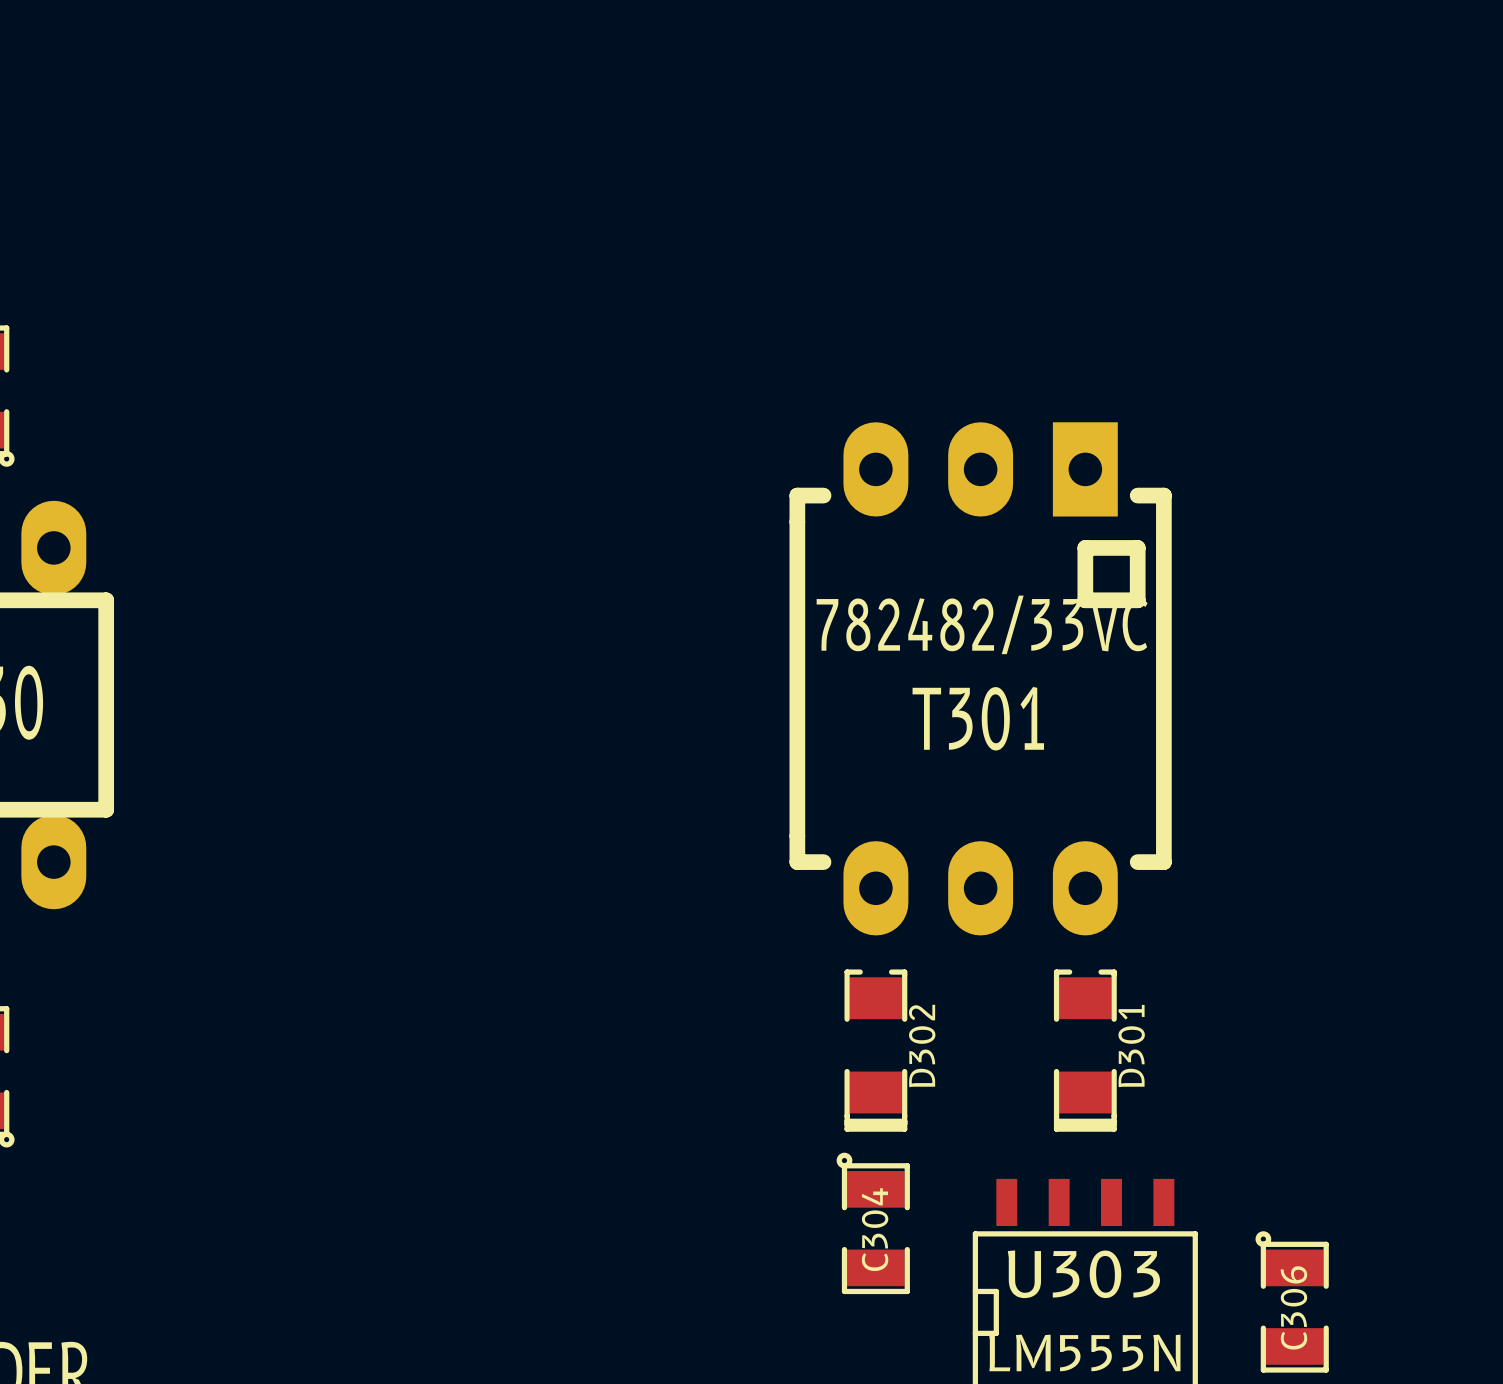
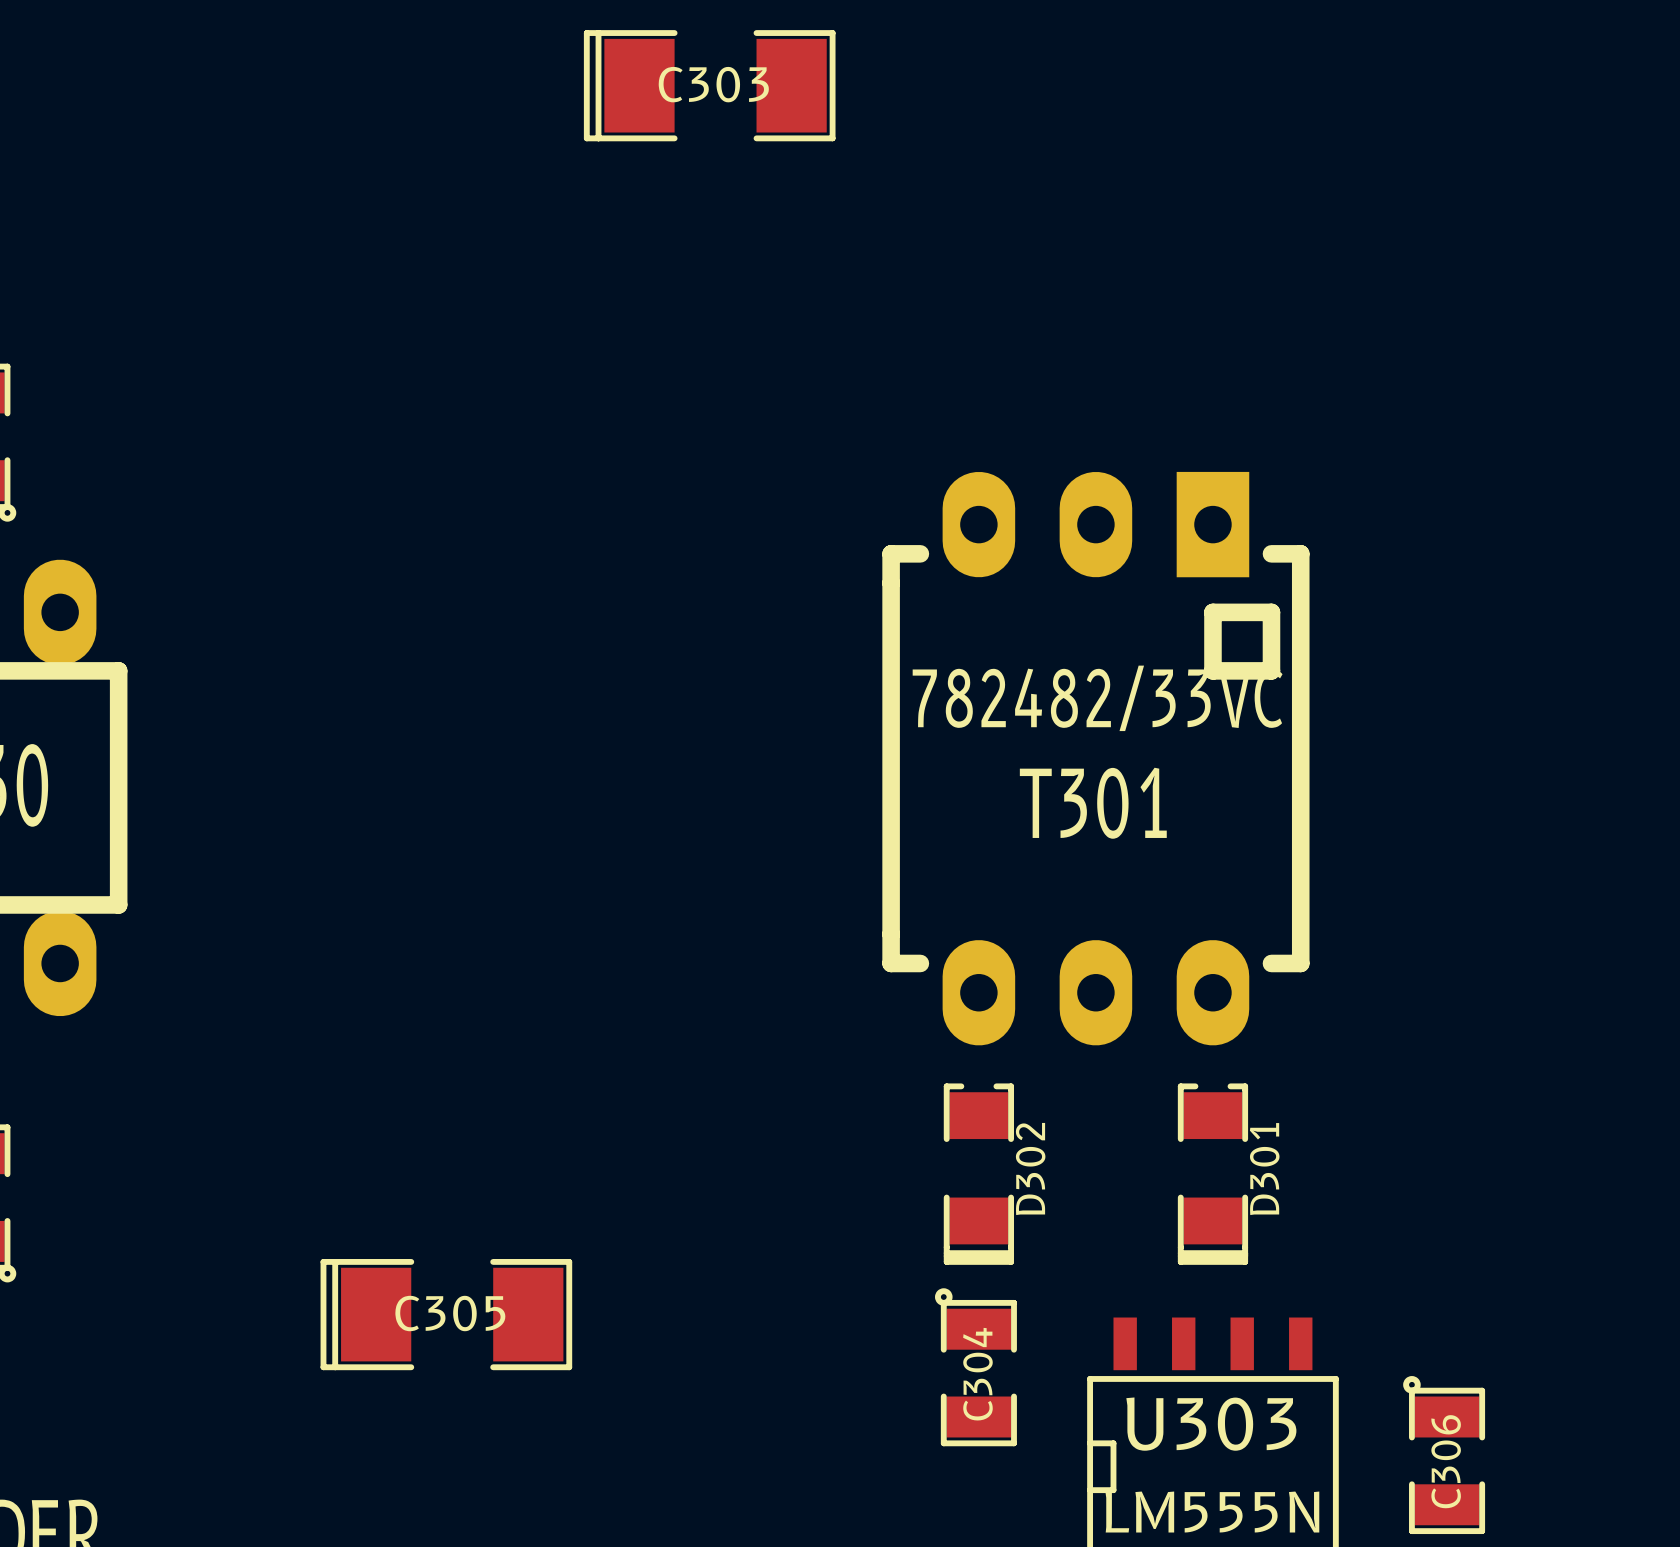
C303: none -> (709, 85)
C305: none -> (446, 1314)

